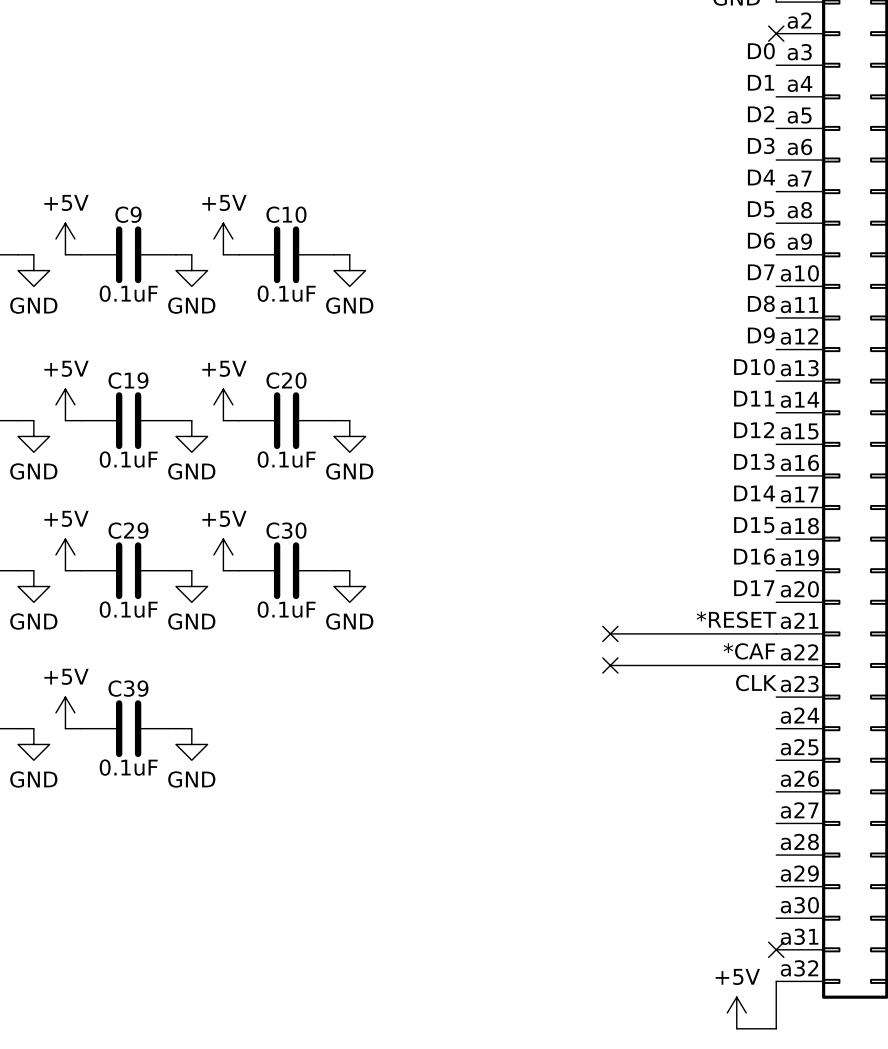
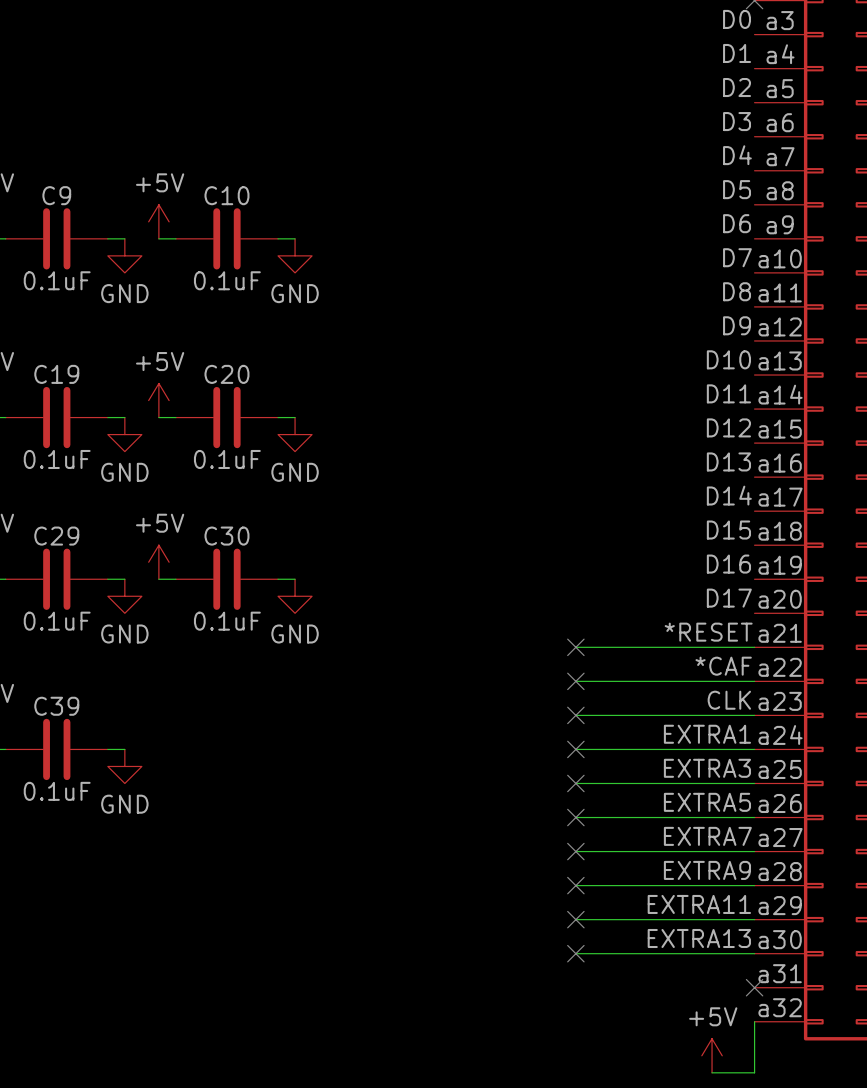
wire: none -> (575, 715) (754, 715)
no-connect mark: none -> (575, 715)
label: none -> EXTRA1 (707, 734)
wire: none -> (575, 749) (754, 749)
no-connect mark: none -> (575, 749)
label: none -> EXTRA3 (707, 768)
wire: none -> (575, 783) (754, 783)
no-connect mark: none -> (575, 783)
label: none -> EXTRA5 (707, 802)
wire: none -> (575, 817) (754, 817)
no-connect mark: none -> (575, 817)
label: none -> EXTRA7 (707, 836)
wire: none -> (575, 851) (754, 851)
no-connect mark: none -> (575, 851)
label: none -> EXTRA9 (707, 870)
wire: none -> (575, 885) (754, 885)
no-connect mark: none -> (575, 885)
label: none -> EXTRA11 (699, 904)
wire: none -> (575, 919) (754, 919)
no-connect mark: none -> (575, 919)
label: none -> EXTRA13 (699, 938)
wire: none -> (575, 953) (754, 953)
no-connect mark: none -> (575, 953)

